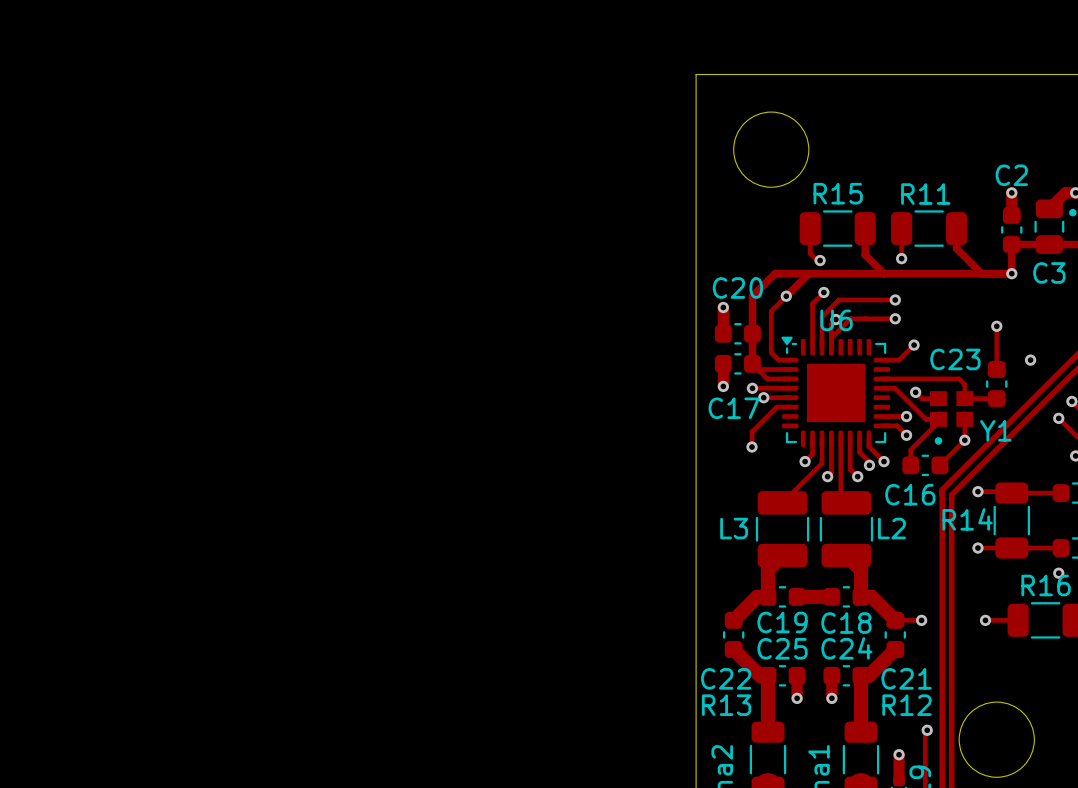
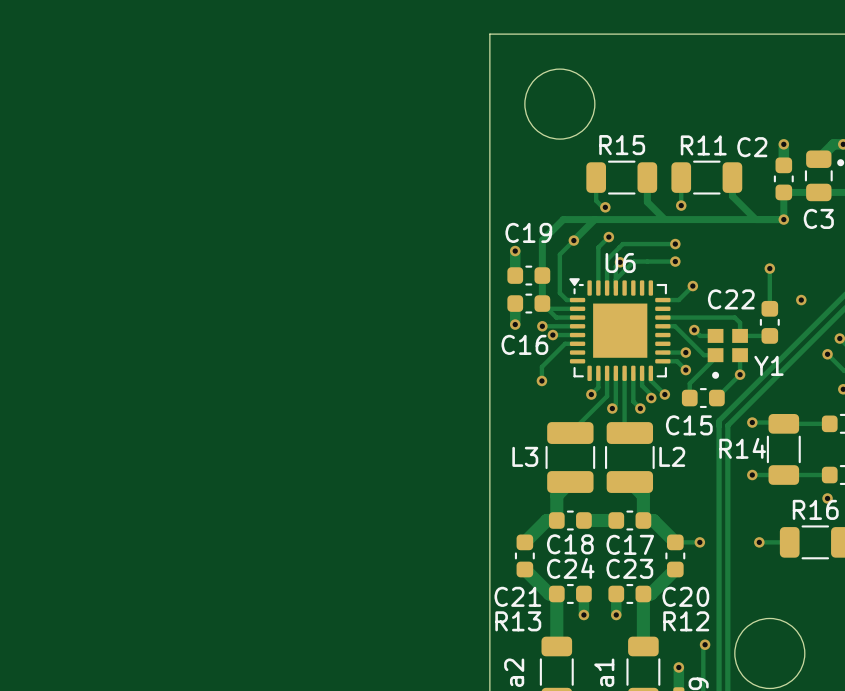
C2 name position: C2 (1011, 175) -> C2 (752, 147)
C20 name: C20 (737, 288) -> C19 (528, 232)
C23 name: C23 (955, 359) -> C22 (731, 299)
C17 name: C17 (734, 408) -> C16 (524, 344)
C16 name: C16 (910, 494) -> C15 (689, 425)
C19 name: C19 (782, 622) -> C18 (570, 544)
C18 name: C18 (846, 623) -> C17 (630, 544)
C25 name: C25 (782, 648) -> C24 (570, 568)
C24 name: C24 (846, 648) -> C23 (629, 568)
C22 name: C22 (726, 678) -> C21 (517, 596)
C21 name: C21 (906, 678) -> C20 (685, 596)

